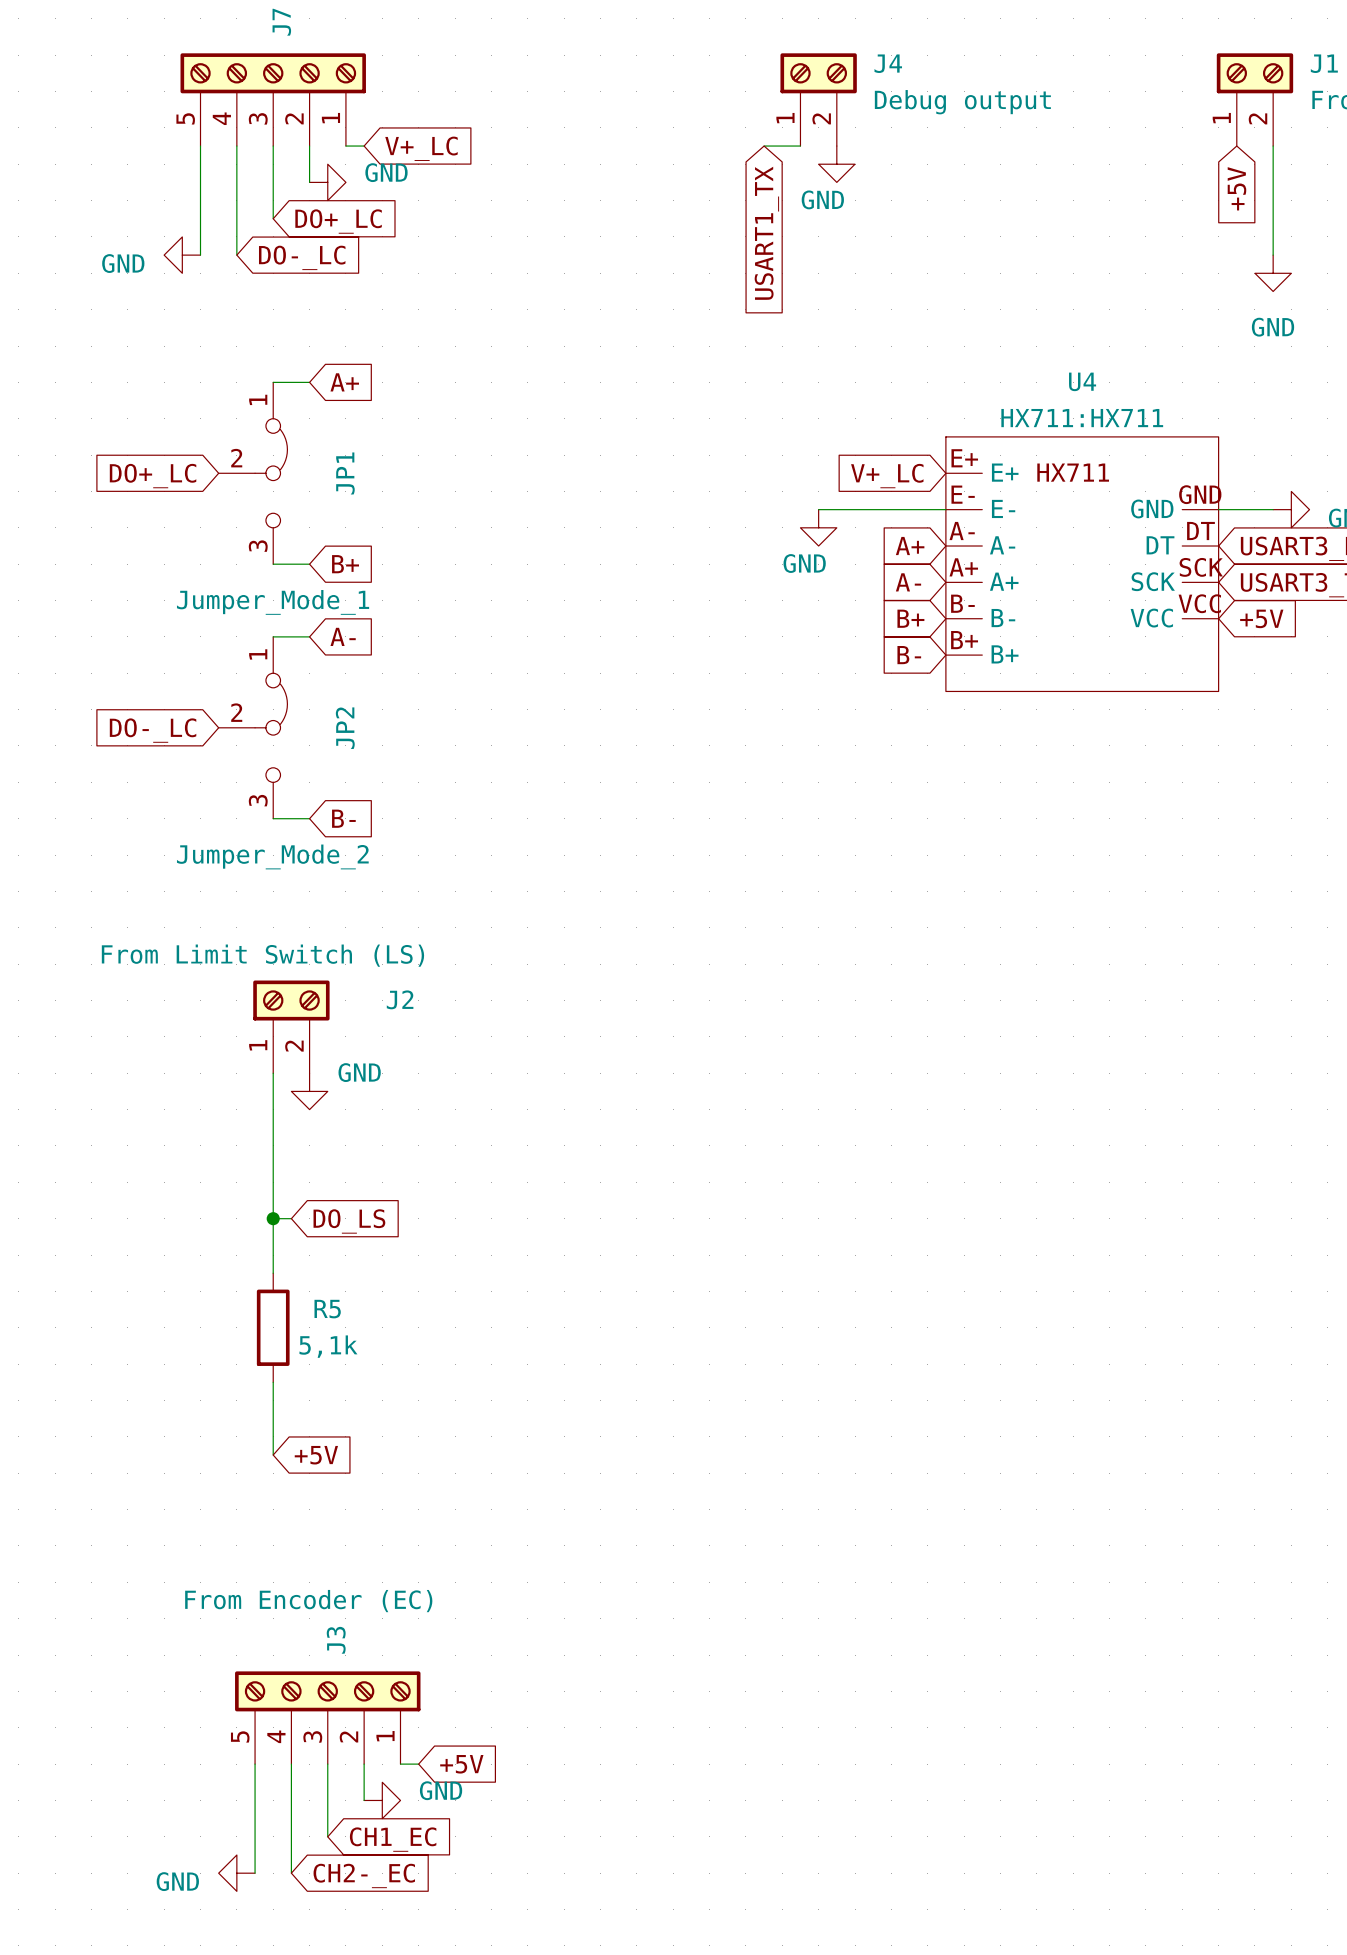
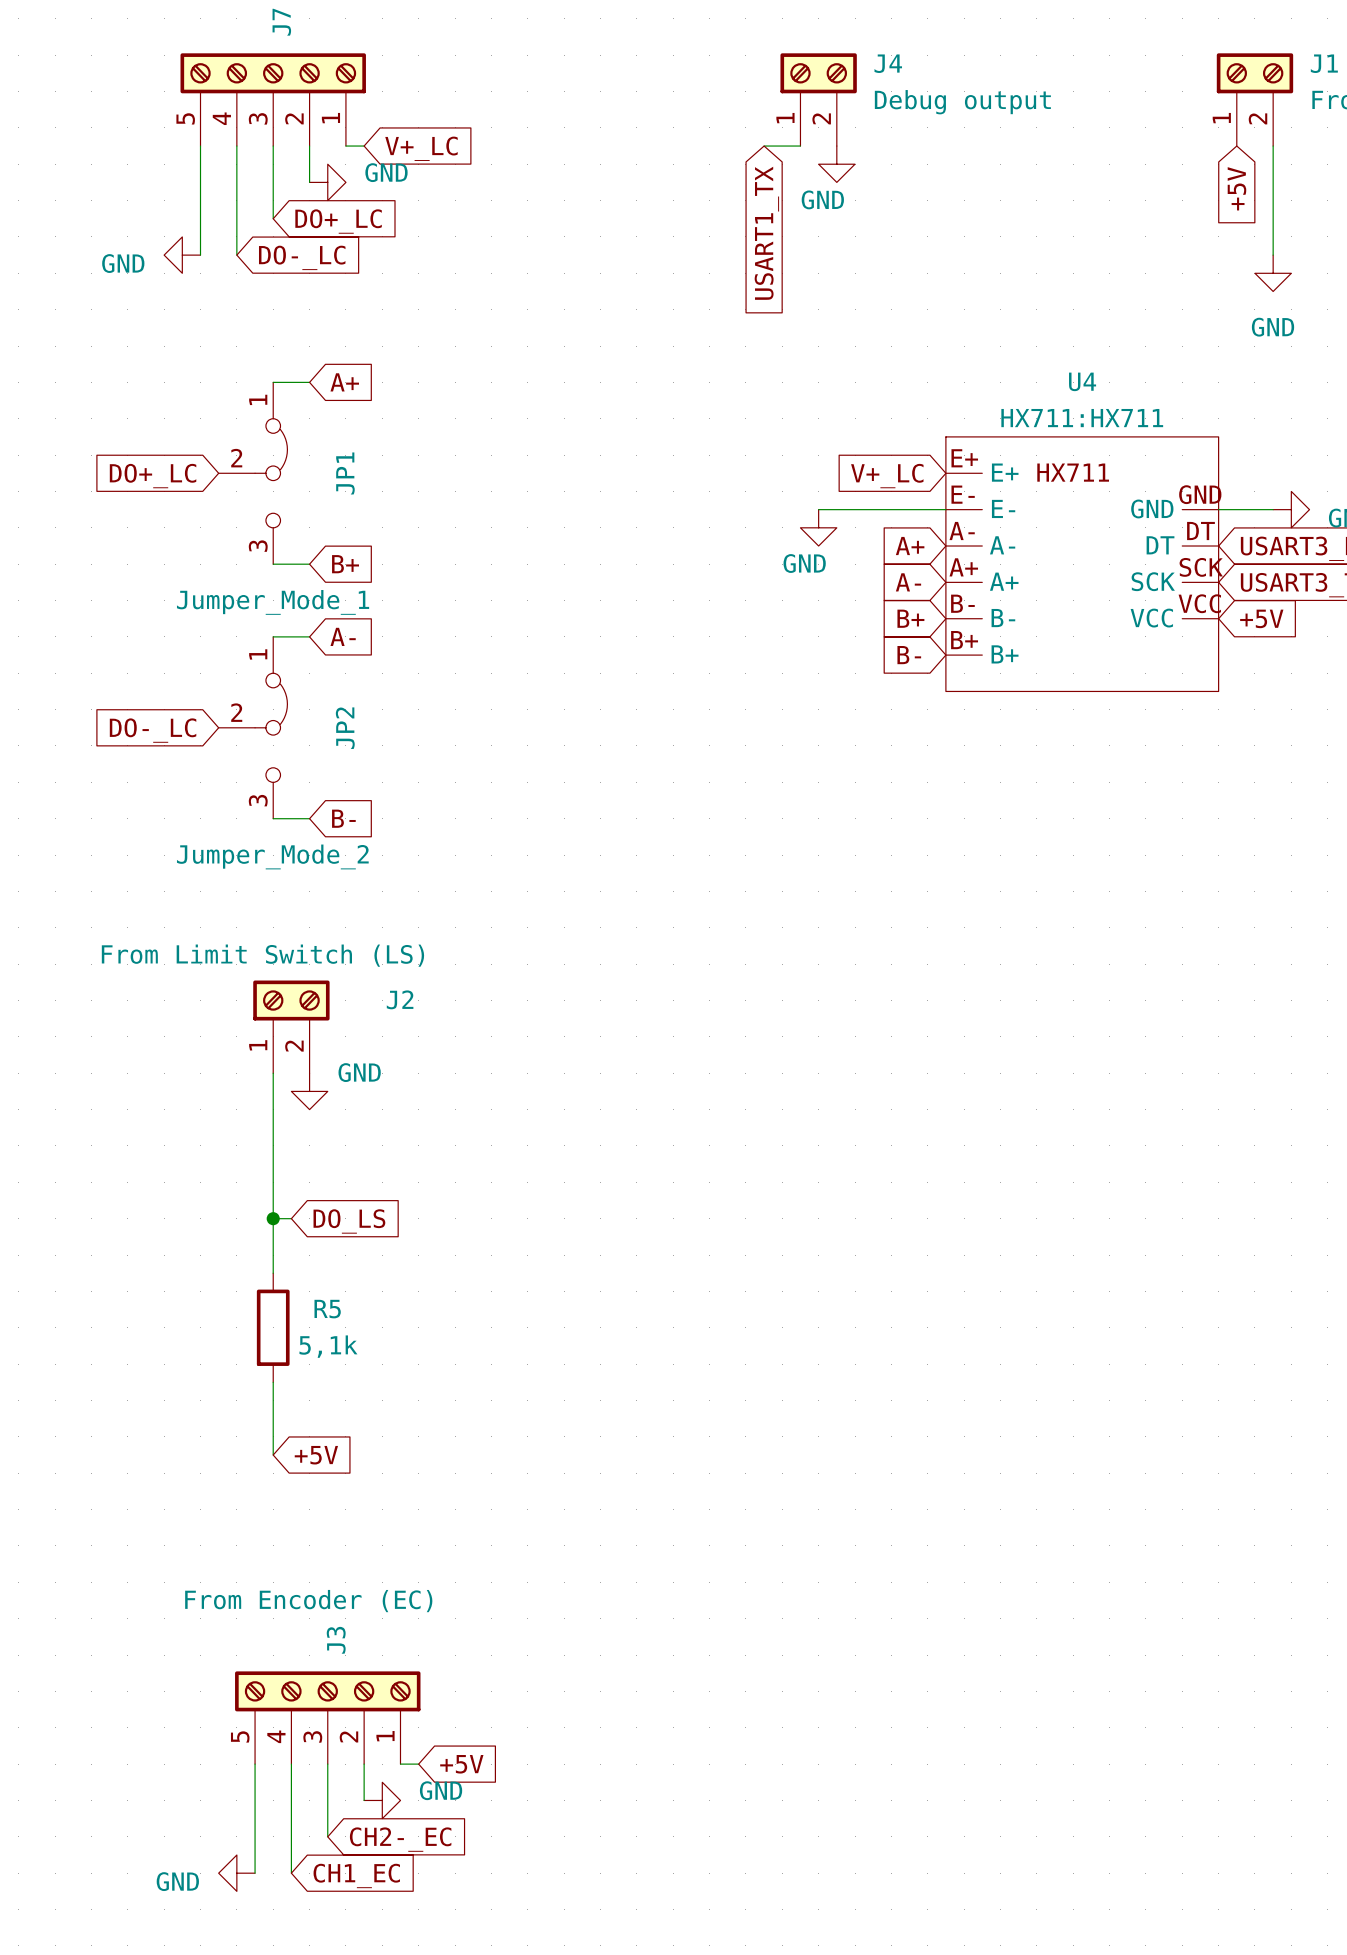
global label: CH1_EC (393, 1839) -> CH2-_EC (400, 1839)
global label: CH2-_EC (364, 1875) -> CH1_EC (356, 1875)

